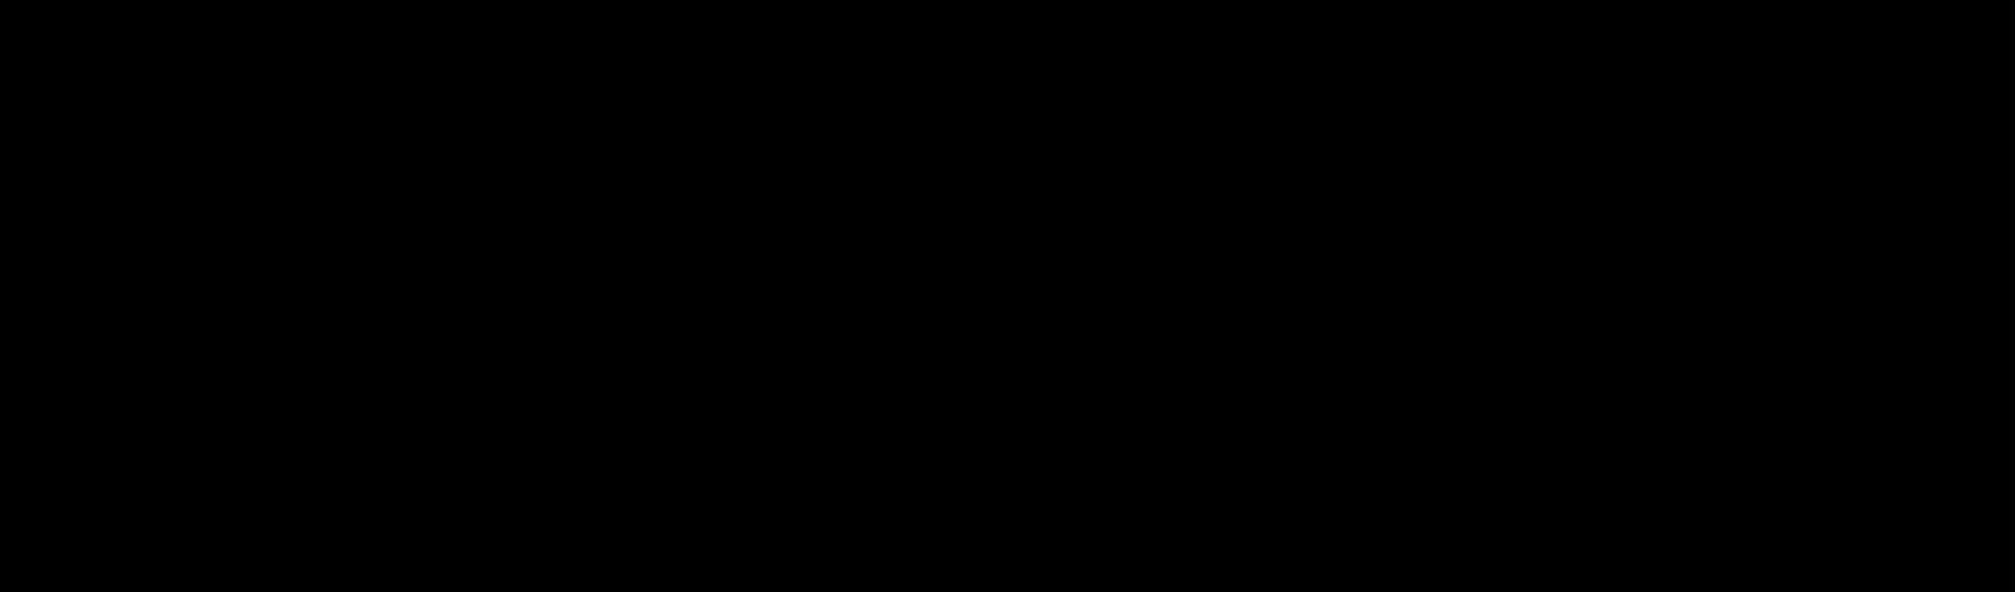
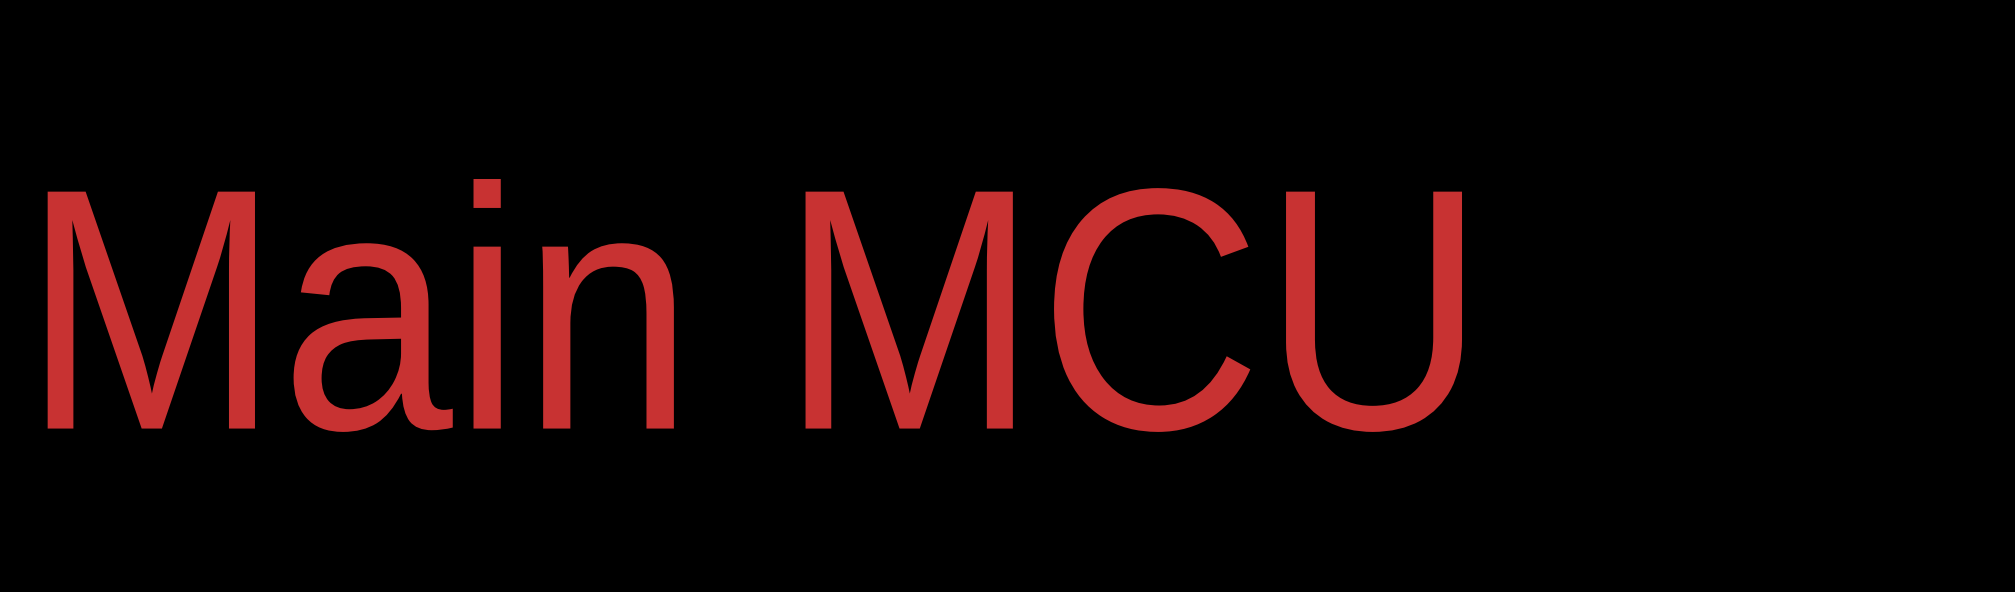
text: none -> Main MCU (754, 305)

